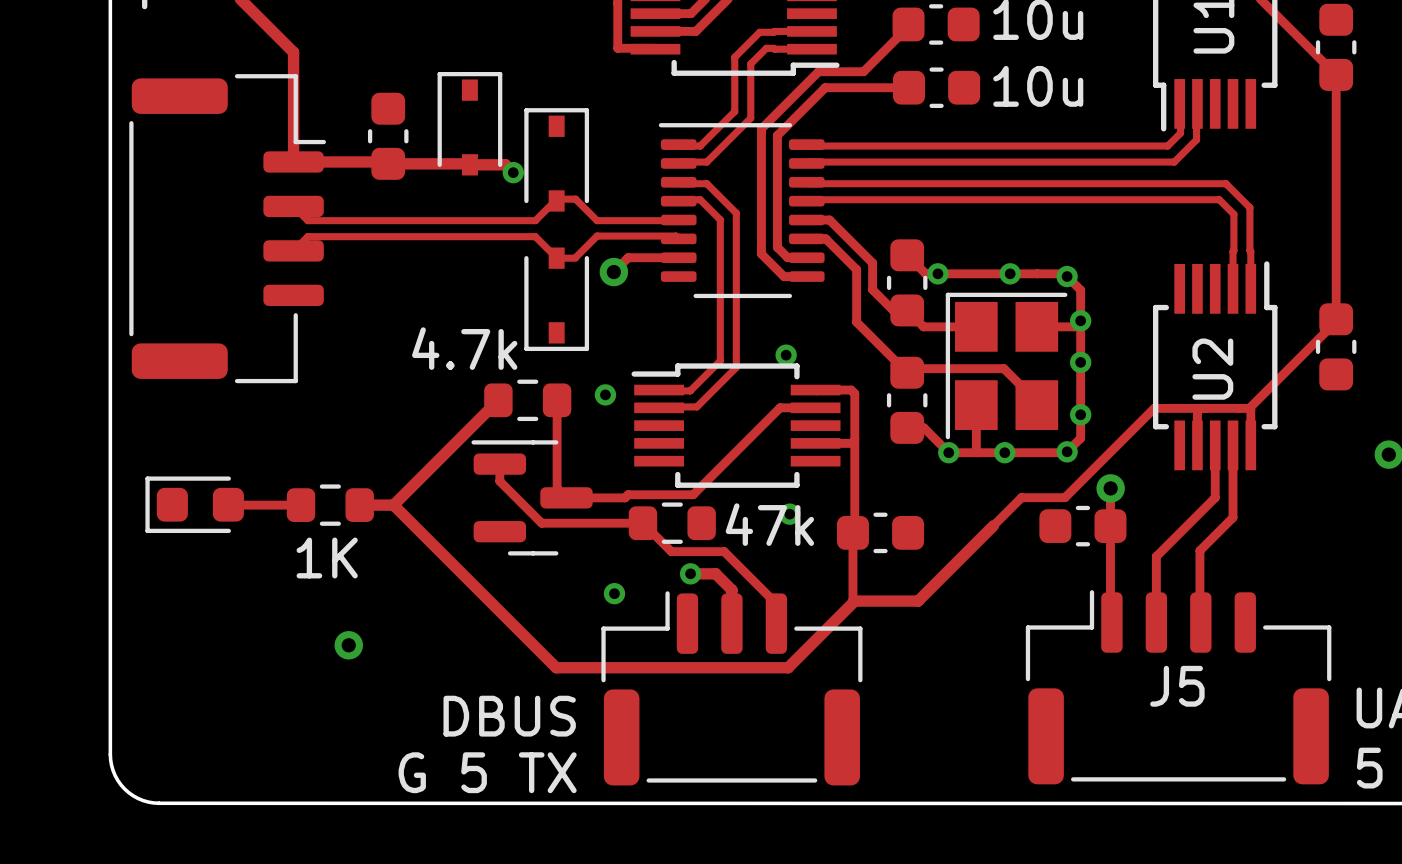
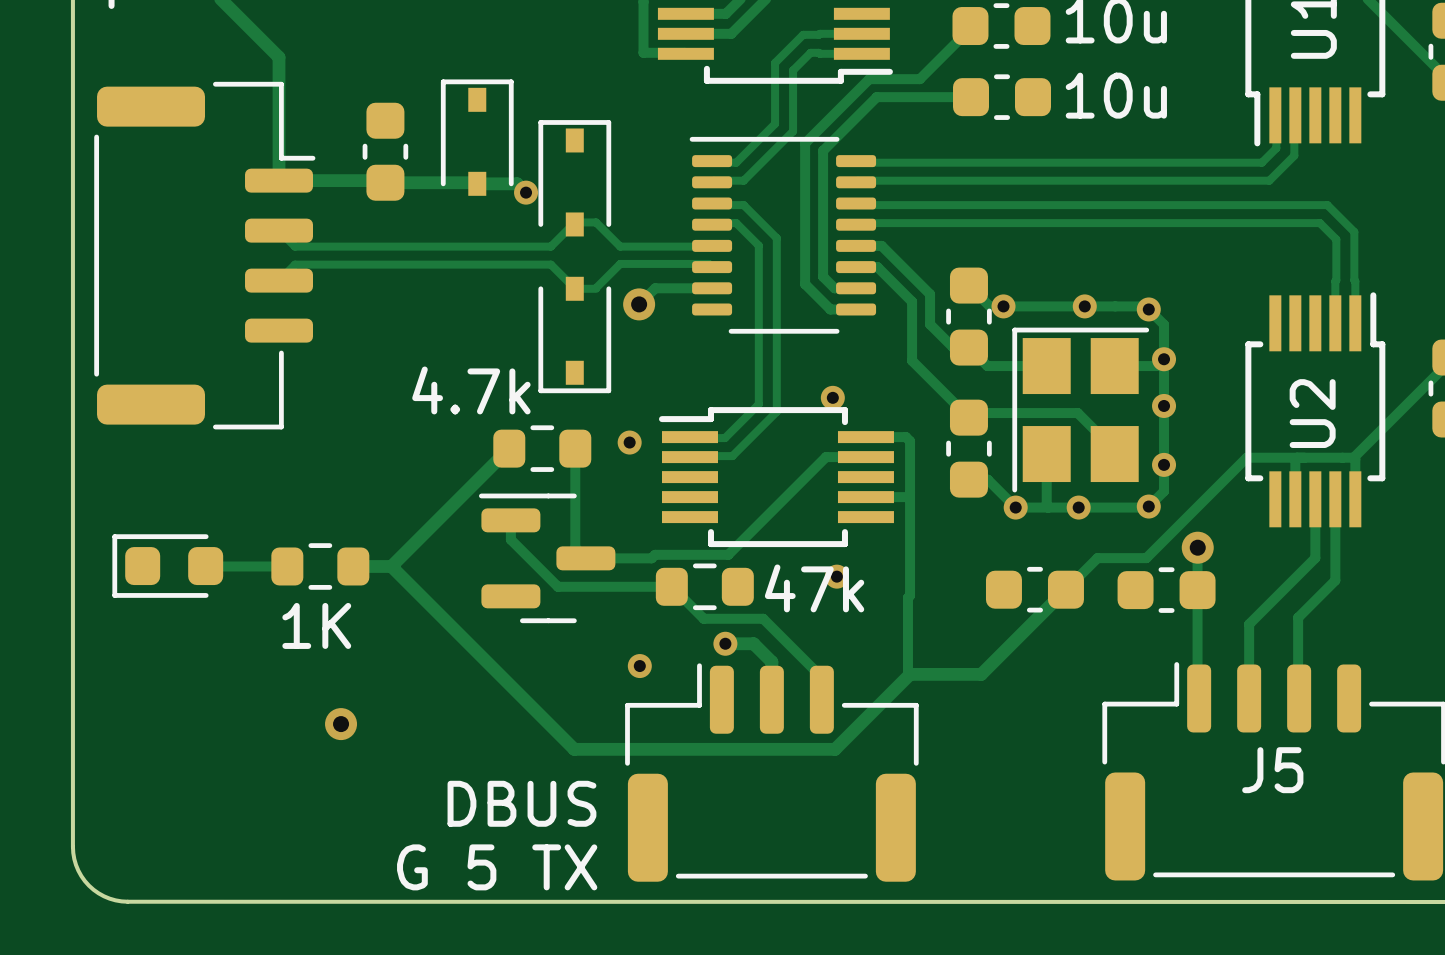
part position: (880, 532) -> (1034, 589)

